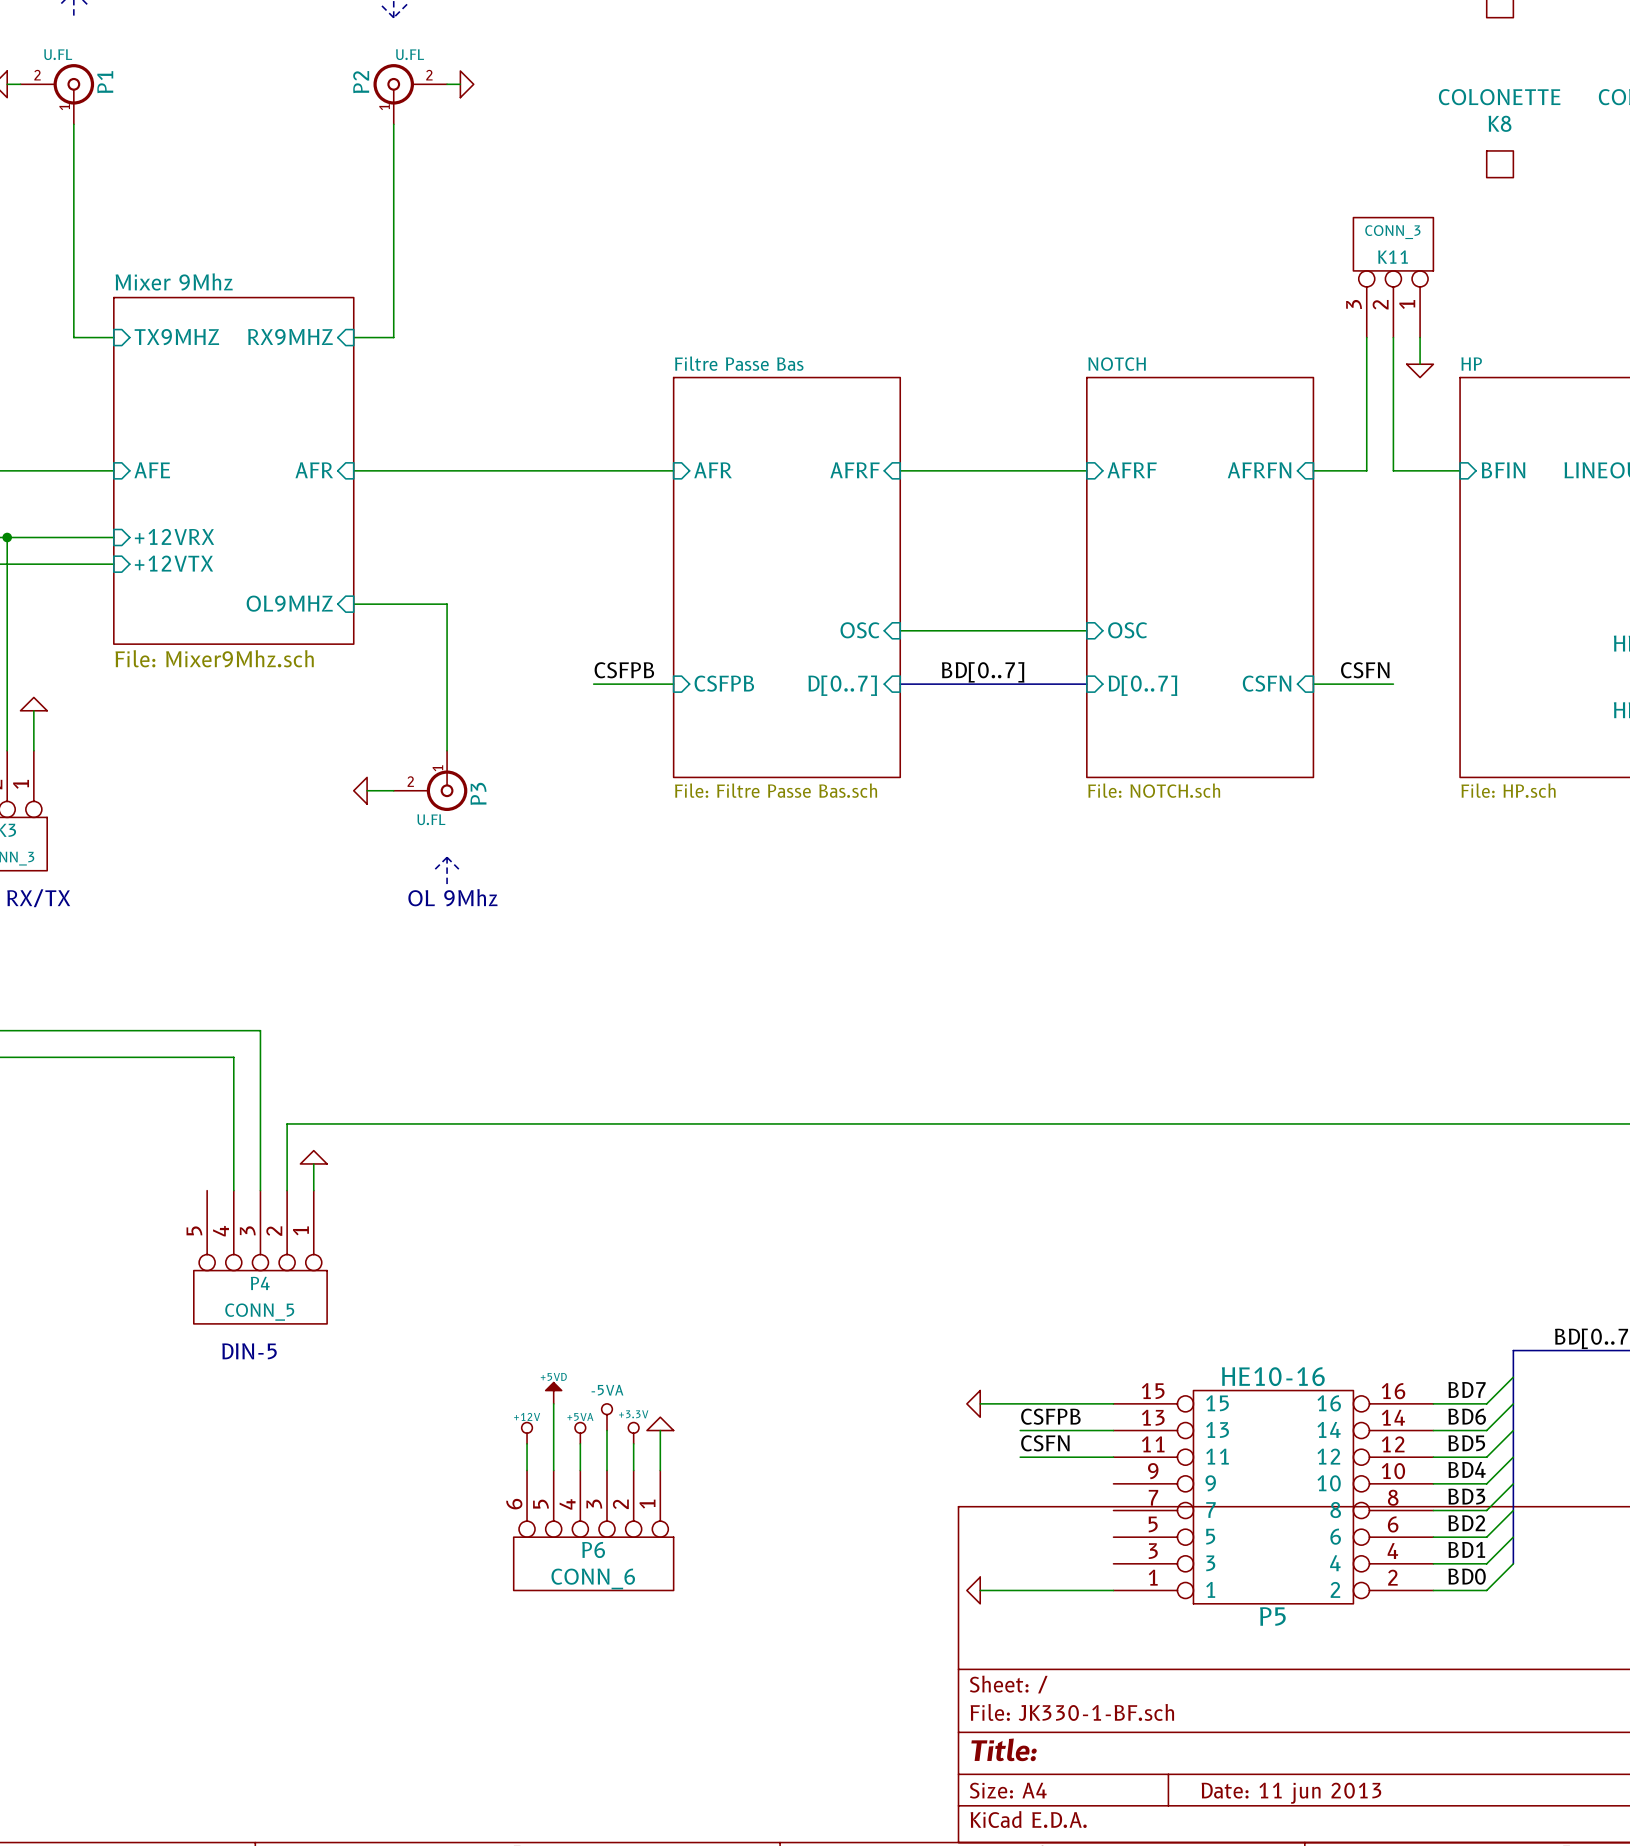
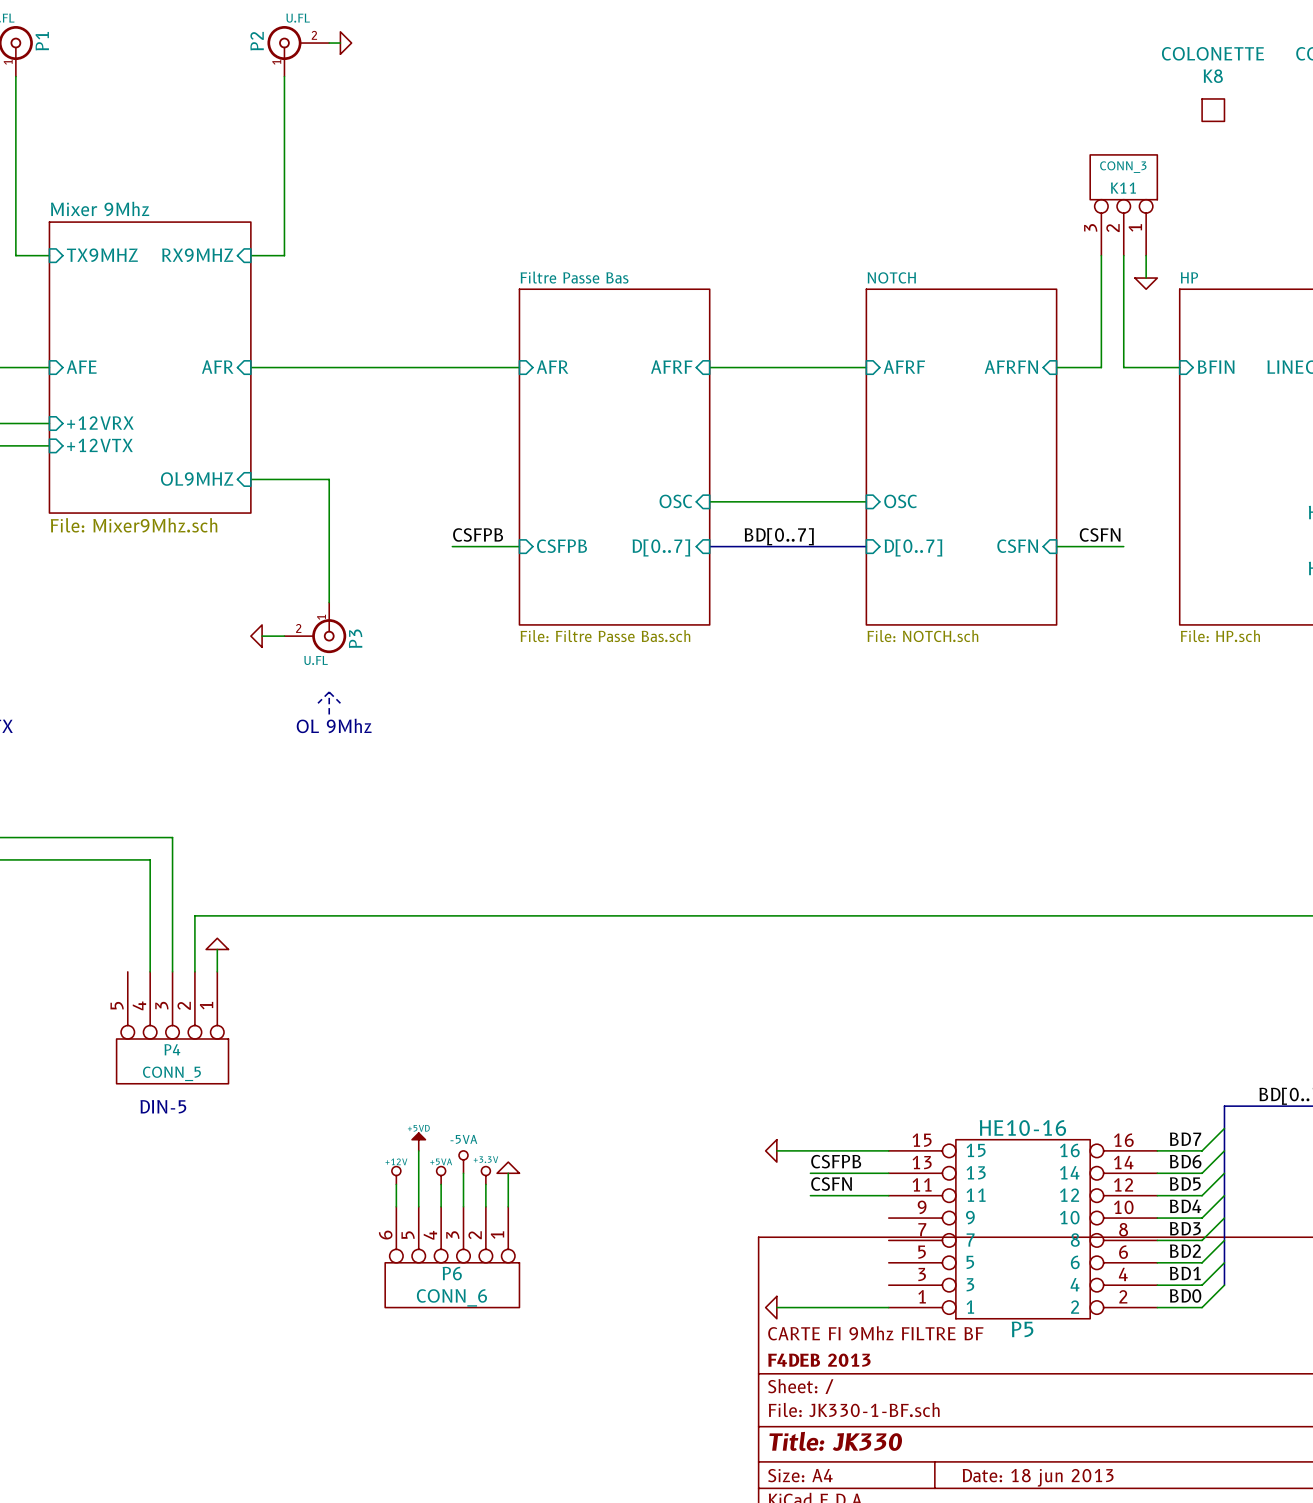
title block: none -> CARTE FI 9Mhz FILTRE BF (875, 1333)
title block: none -> F4DEB 2013 (819, 1360)
title block: Title: (1004, 1749) -> Title: JK330 (835, 1441)
title block: Date: 11 jun 2013 (1291, 1793) -> Date: 18 jun 2013 (1038, 1477)

